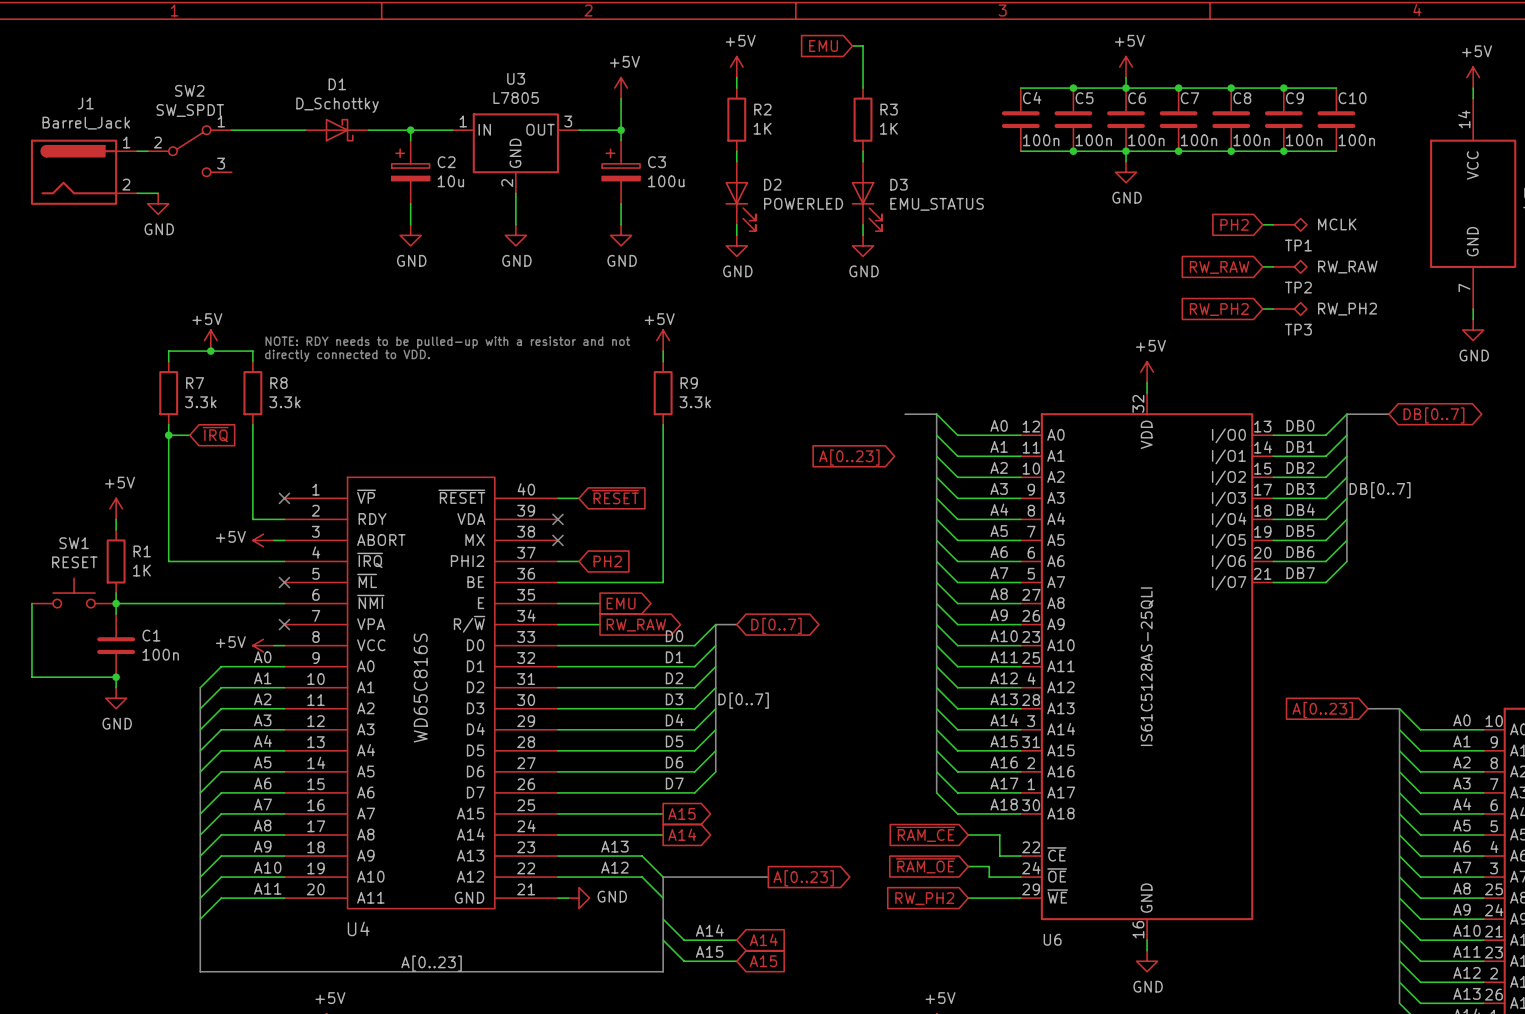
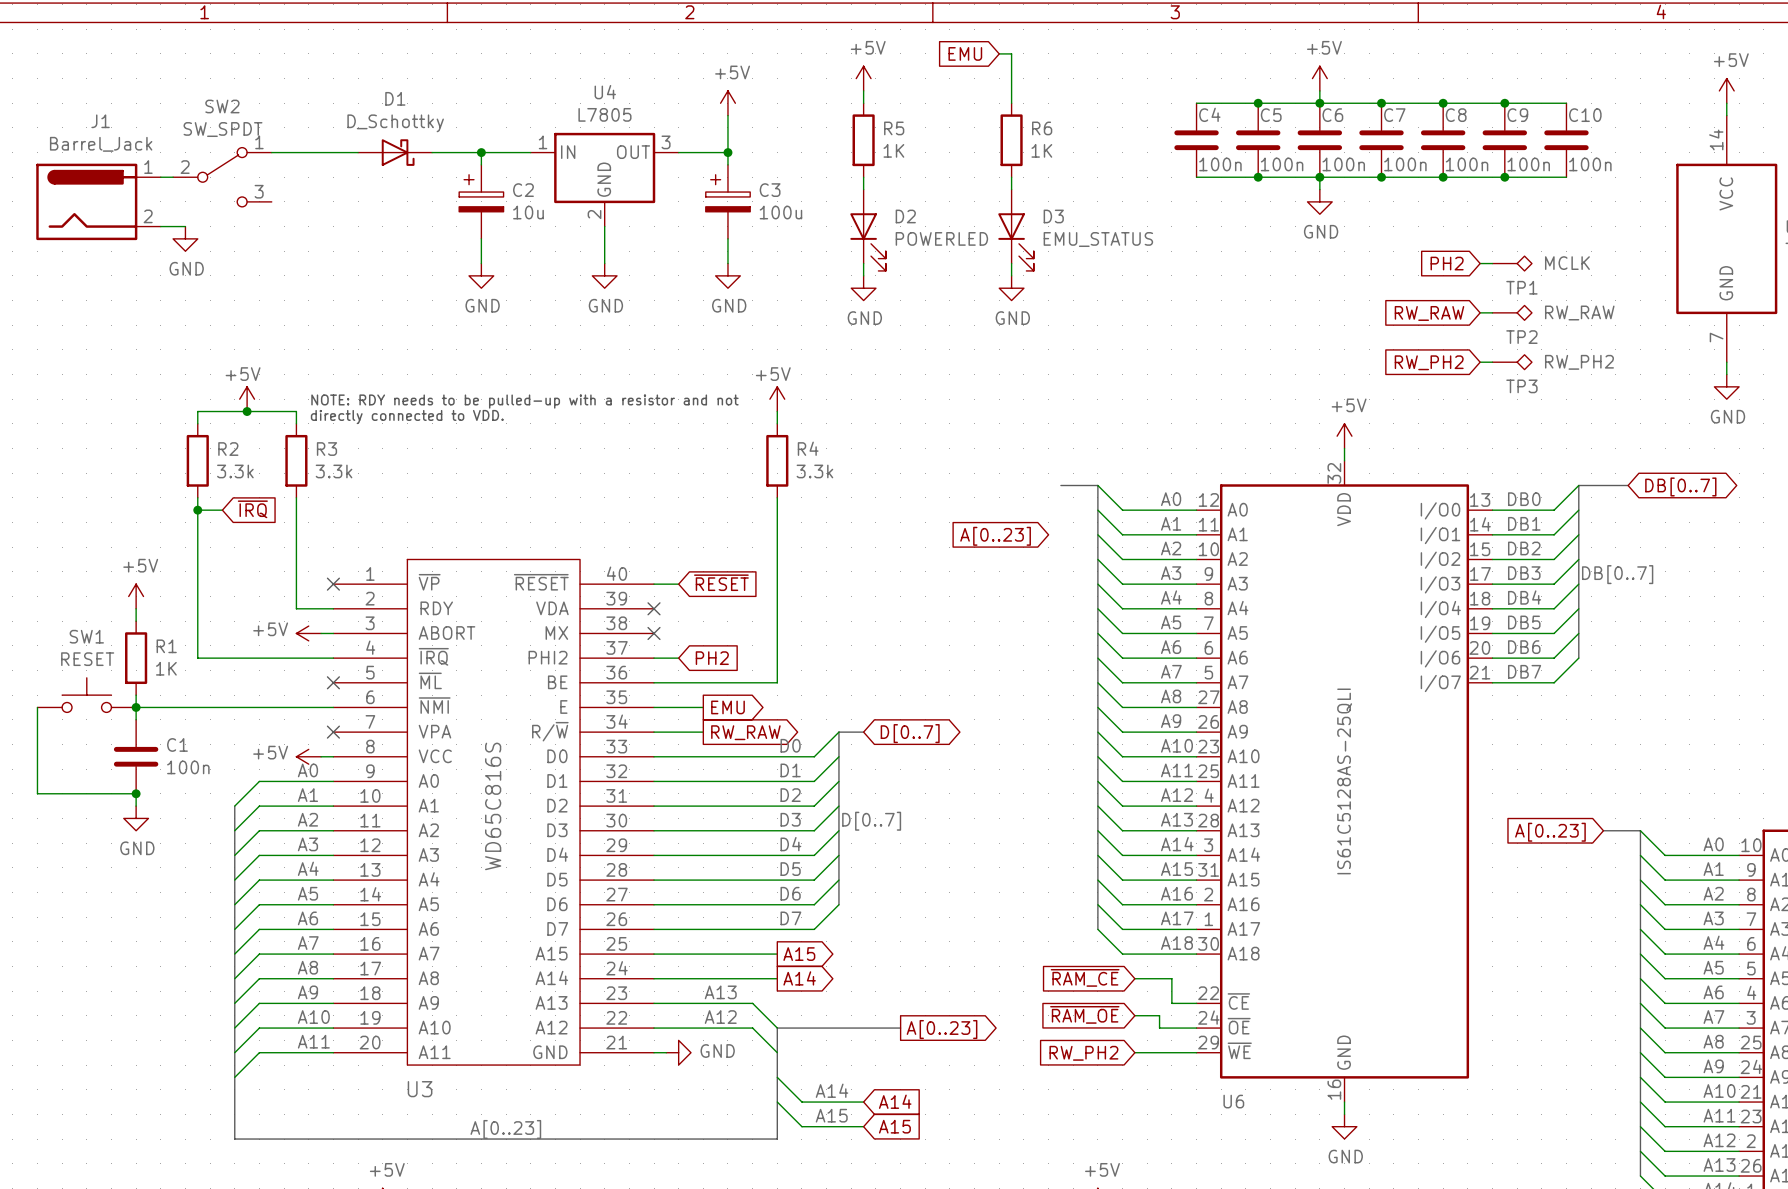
U3 name: U3 (516, 78) -> U4 (605, 92)
R2 name: R2 (762, 109) -> R5 (894, 128)
R3 name: R3 (889, 109) -> R6 (1042, 128)
R7 name: R7 (195, 383) -> R2 (228, 449)
R8 name: R8 (278, 383) -> R3 (326, 449)
R9 name: R9 (689, 383) -> R4 (808, 448)
U4 name: U4 (358, 928) -> U3 (420, 1089)

